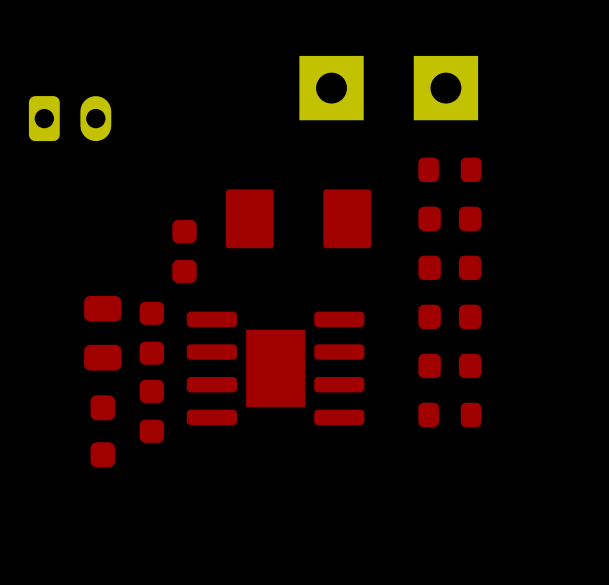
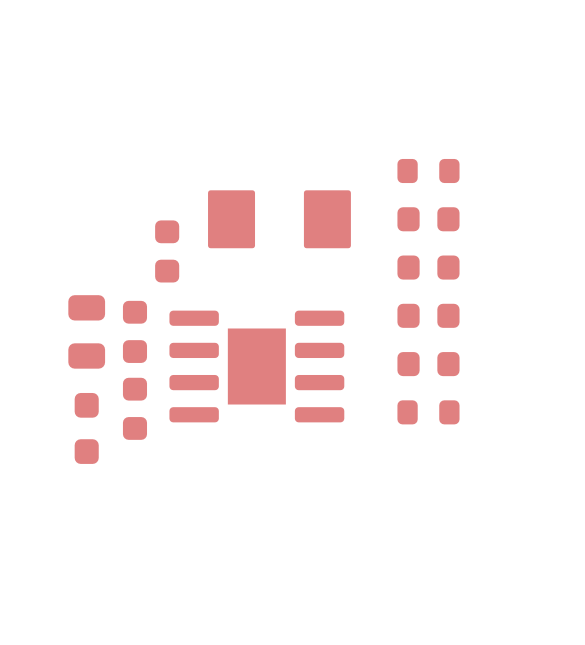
part: (331, 88) -> none
part: (445, 88) -> none
part: (70, 118) -> none

